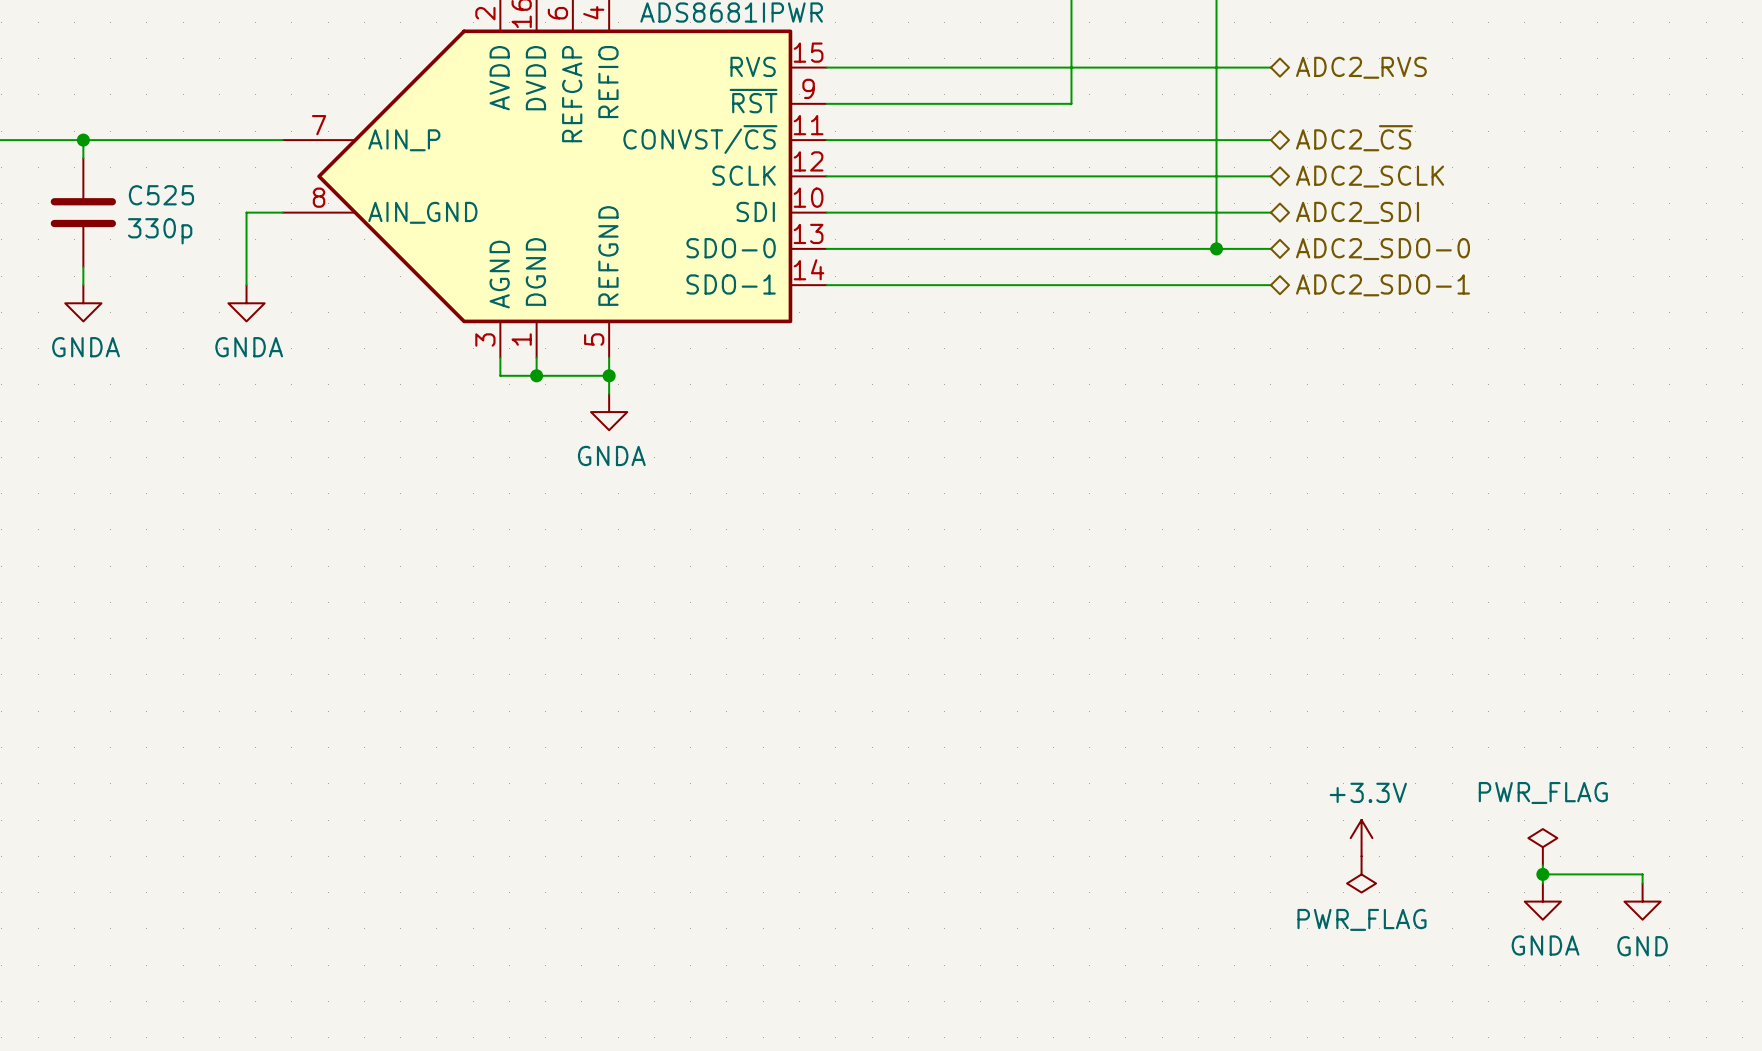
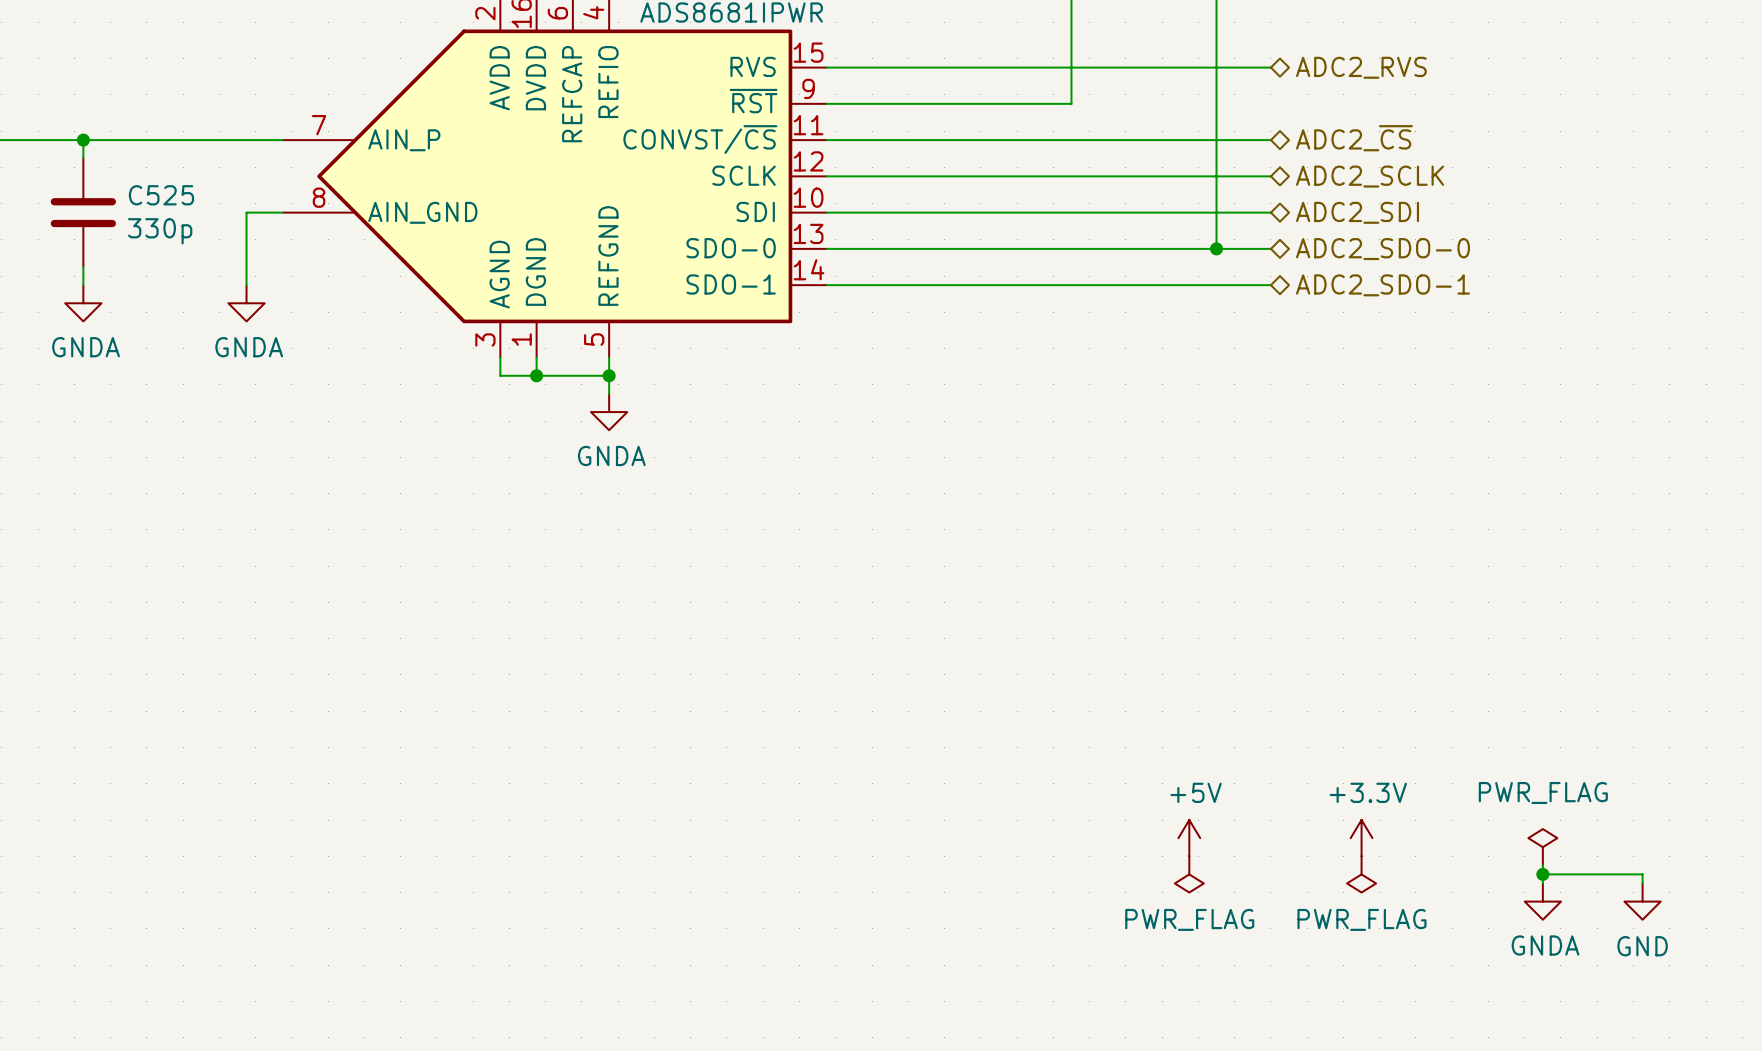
power symbol: none -> +5V (1189, 838)
power symbol: none -> PWR_FLAG (1189, 874)

